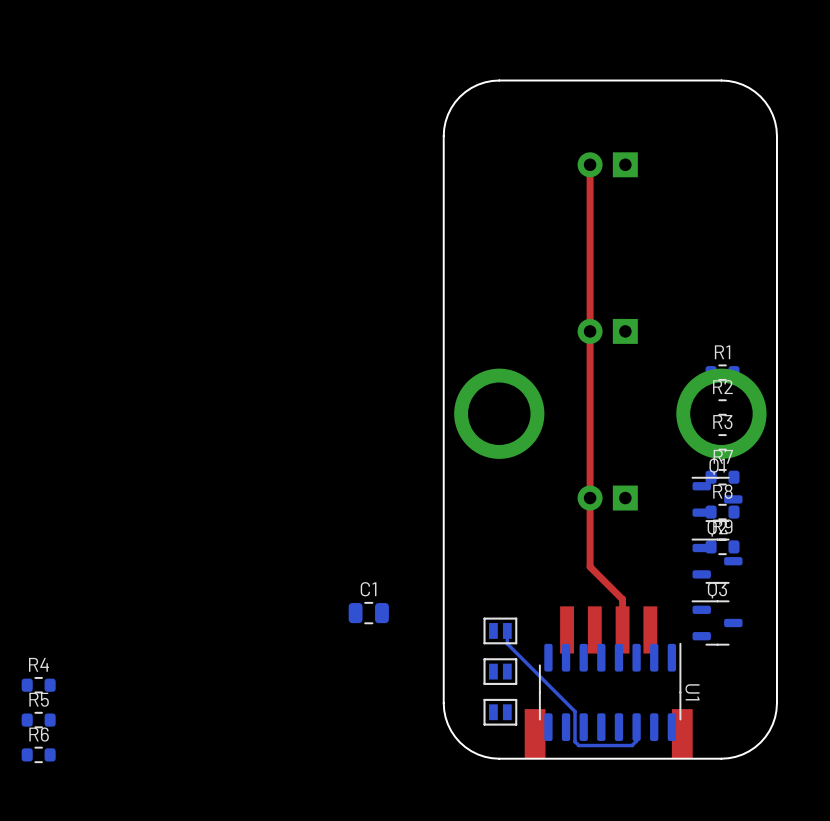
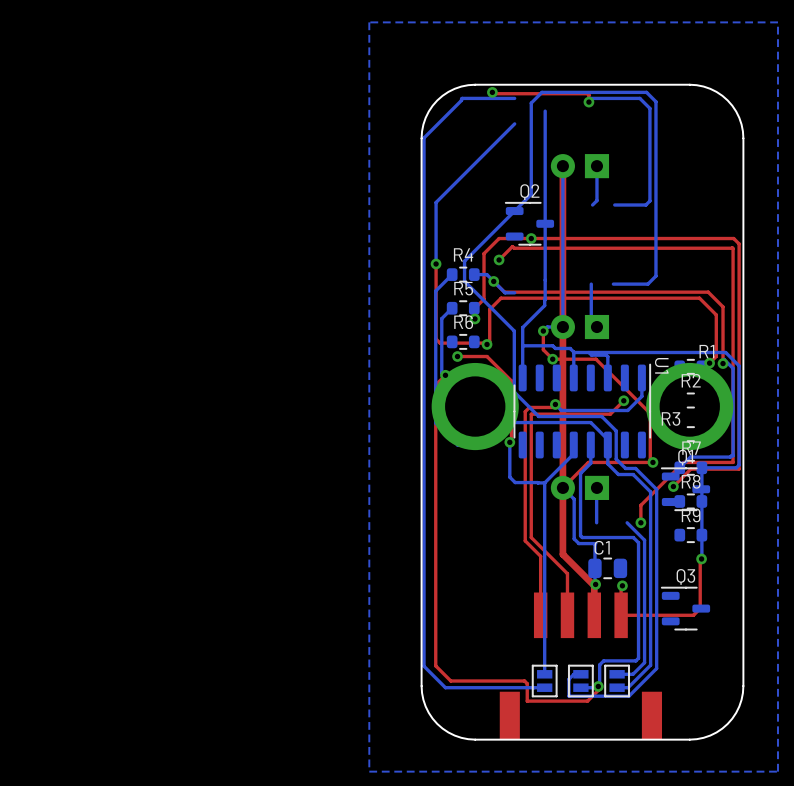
bottom zone outline: none -> (777, 22) (369, 22) (369, 771) (777, 771) (777, 22)
top track: none -> (492, 92) (587, 93) (588, 102)
via: none -> (492, 92)
bottom track: none -> (514, 98) (462, 98) (424, 137) (424, 666) (445, 687) (544, 687)
bottom track: none -> (588, 102) (588, 98) (639, 98) (649, 108) (649, 200) (645, 205) (614, 205)
via: none -> (588, 102)
bottom track: none -> (545, 111) (545, 299) (544, 305) (522, 327) (522, 377)
bottom track: none -> (514, 123) (436, 202) (436, 264)
bottom track: none -> (562, 166) (562, 327) (547, 327) (543, 331)
bottom track: none -> (596, 166) (596, 200) (592, 205)
via: none -> (531, 238)
top track: none -> (499, 259) (512, 246) (514, 248) (733, 248) (733, 462) (683, 462) (640, 505) (640, 522)
via: none -> (499, 259)
top track: none -> (436, 264) (436, 339) (440, 343) (487, 344) (489, 341) (489, 309) (501, 298) (699, 298) (716, 314) (716, 356) (709, 363)
via: none -> (436, 264)
bottom track: none -> (452, 274) (435, 291) (435, 423) (457, 445) (489, 445) (512, 422) (590, 422) (607, 439) (607, 463) (618, 474) (633, 474) (650, 491) (650, 665) (628, 687) (617, 687)
bottom track: none -> (474, 274) (486, 274) (505, 292) (514, 292)
top track: none -> (493, 281) (504, 292) (708, 292) (723, 306) (723, 363)
via: none -> (493, 281)
bottom track: none -> (591, 284) (591, 321) (596, 327)
bottom track: none -> (613, 284) (647, 284) (655, 276) (655, 101) (646, 92) (542, 92) (531, 103) (531, 194) (464, 261) (464, 281) (514, 331) (514, 392) (538, 416) (601, 416) (616, 430) (616, 459) (625, 468) (635, 468) (656, 489) (656, 668) (628, 696) (568, 696) (568, 679) (573, 674) (580, 674)
bottom track: none -> (452, 308) (441, 318) (441, 372) (445, 375)
top track: none -> (474, 318) (474, 308) (484, 299) (484, 253) (499, 238) (733, 238) (739, 243) (739, 469) (690, 469) (673, 486)
via: none -> (474, 318)
top track: none -> (543, 331) (543, 349) (552, 359) (595, 359) (650, 413) (650, 459) (652, 462) (588, 462) (562, 487)
via: none -> (543, 331)
via: none -> (487, 344)
bottom track: none -> (522, 345) (552, 345) (555, 348) (570, 348) (574, 352) (725, 352) (739, 365) (739, 465) (736, 467) (701, 467) (701, 558)
R1 name position: R1 (722, 352) -> R1 (706, 351)
bottom track: none -> (573, 352) (573, 377)
bottom track: none -> (588, 352) (591, 355) (607, 356) (607, 377)
top track: none -> (457, 356) (487, 356) (511, 380) (511, 440) (509, 442)
via: none -> (457, 356)
via: none -> (552, 359)
via: none -> (709, 363)
bottom track: none -> (723, 363) (724, 359) (733, 368) (733, 455) (690, 457) (679, 467)
via: none -> (723, 363)
top track: none -> (445, 375) (435, 385) (435, 665) (450, 681) (524, 681) (527, 683) (527, 701) (587, 701) (598, 690) (598, 686)
via: none -> (445, 375)
bottom track: none -> (641, 377) (641, 396) (627, 410) (561, 410) (555, 404)
top track: none -> (623, 400) (610, 414) (531, 414) (531, 537) (567, 573) (567, 615)
via: none -> (623, 400)
top track: none -> (555, 404) (555, 407) (529, 407) (525, 411) (525, 540) (540, 556) (540, 615)
via: none -> (555, 404)
R3 name position: R3 (722, 422) -> R3 (671, 418)
bottom track: none -> (509, 442) (509, 477) (515, 482) (544, 482)
via: none -> (509, 442)
bottom track: none -> (573, 445) (573, 453) (544, 482)
bottom track: none -> (590, 445) (590, 463) (580, 473) (580, 535) (582, 537) (633, 537) (638, 542) (638, 658) (635, 660) (603, 660) (599, 664) (599, 685) (597, 687) (580, 687)
via: none -> (652, 462)
bottom track: none -> (544, 482) (544, 674)
via: none -> (673, 486)
bottom track: none -> (562, 487) (574, 499) (574, 538) (578, 543) (595, 543) (595, 584)
bottom track: none -> (596, 487) (596, 522)
bottom track: none -> (627, 522) (644, 540) (644, 662) (632, 674) (617, 674)
via: none -> (640, 522)
Q2 position: (717, 561) -> (529, 223)
top track: none -> (701, 558) (700, 608) (693, 615) (621, 615) (622, 585)
via: none -> (701, 558)
C1 name position: C1 (368, 589) -> C1 (602, 547)
via: none -> (595, 584)
via: none -> (622, 585)
C1 position: (368, 613) -> (607, 568)
part: (500, 630) -> none
bottom track: (507, 630) (507, 643) (575, 711) (575, 741) (578, 745) (632, 745) (636, 741) (636, 727) -> none
part: (500, 671) -> none
R4 position: (38, 685) -> (463, 274)
U1 position: (610, 692) -> (582, 411)
U1 name position: U1 (692, 692) -> U1 (661, 365)
part: none -> (544, 681)
part: none -> (580, 681)
part: none -> (617, 681)
via: none -> (598, 686)
part: (500, 712) -> none
R5 position: (38, 720) -> (463, 308)
R6 position: (38, 754) -> (463, 341)

